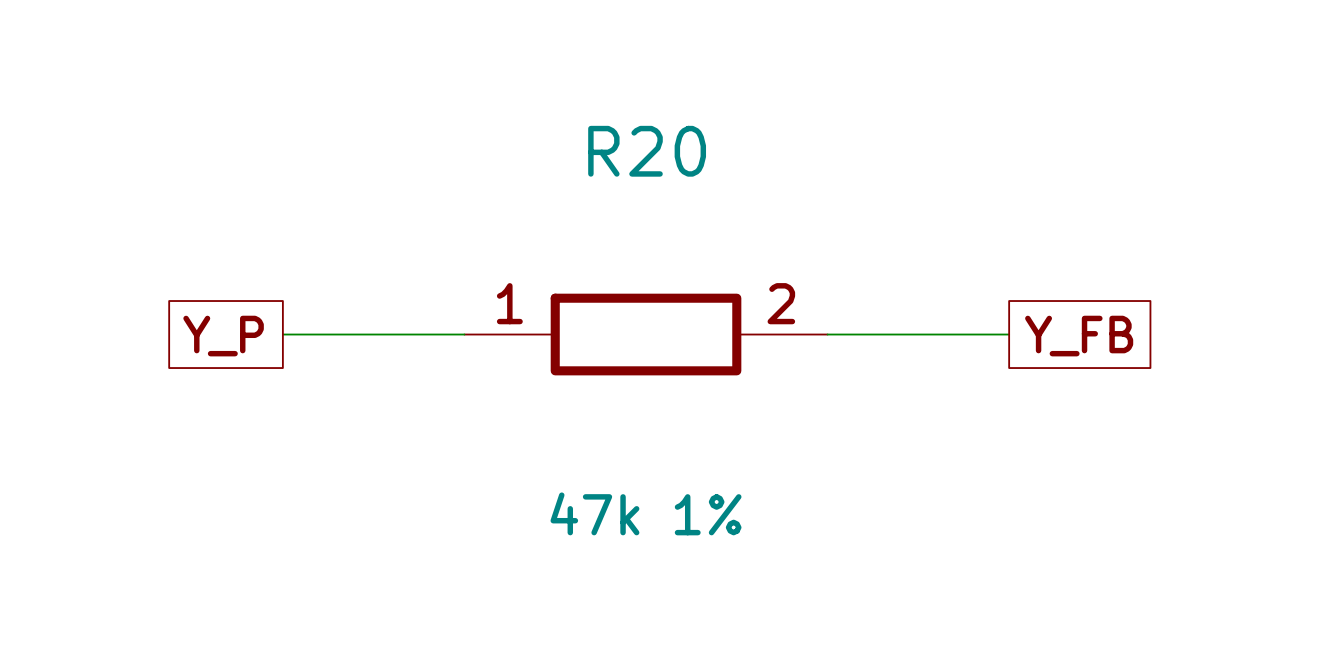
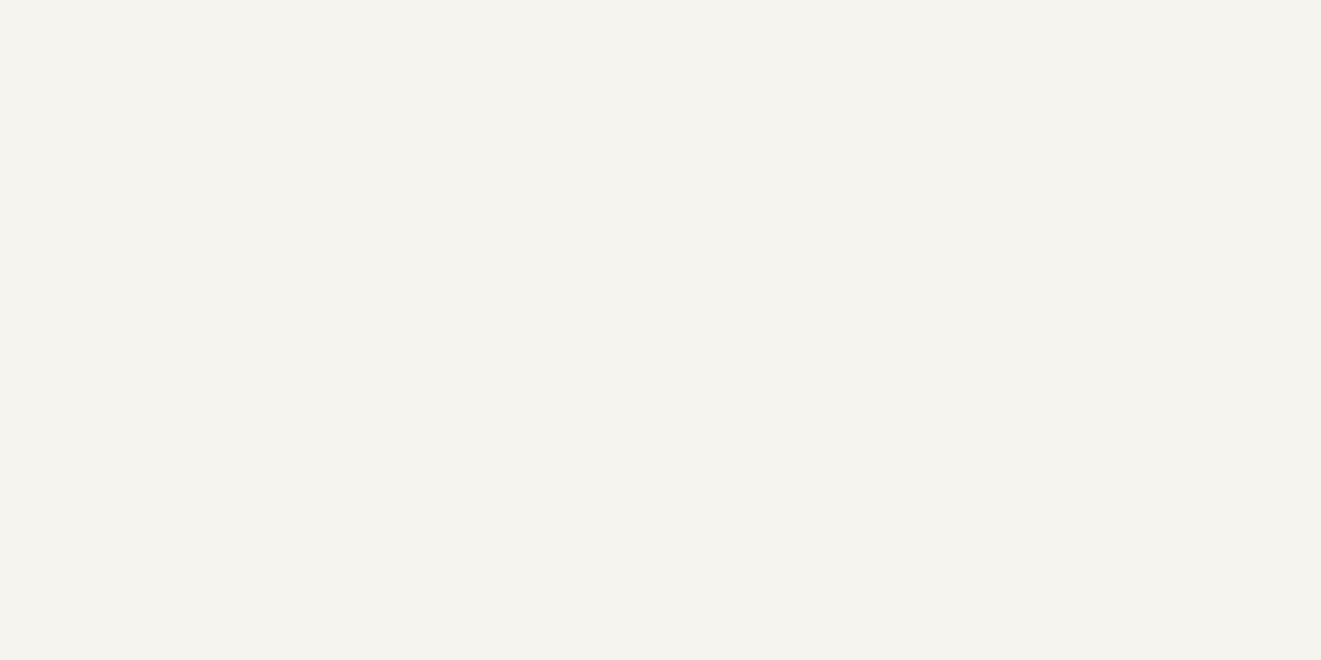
wire: (282, 334) (464, 334) -> none
R20: 47k 1% (646, 334) -> none
wire: (827, 334) (1009, 334) -> none
global label: Y_P (223, 336) -> none
global label: Y_FB (1079, 336) -> none

